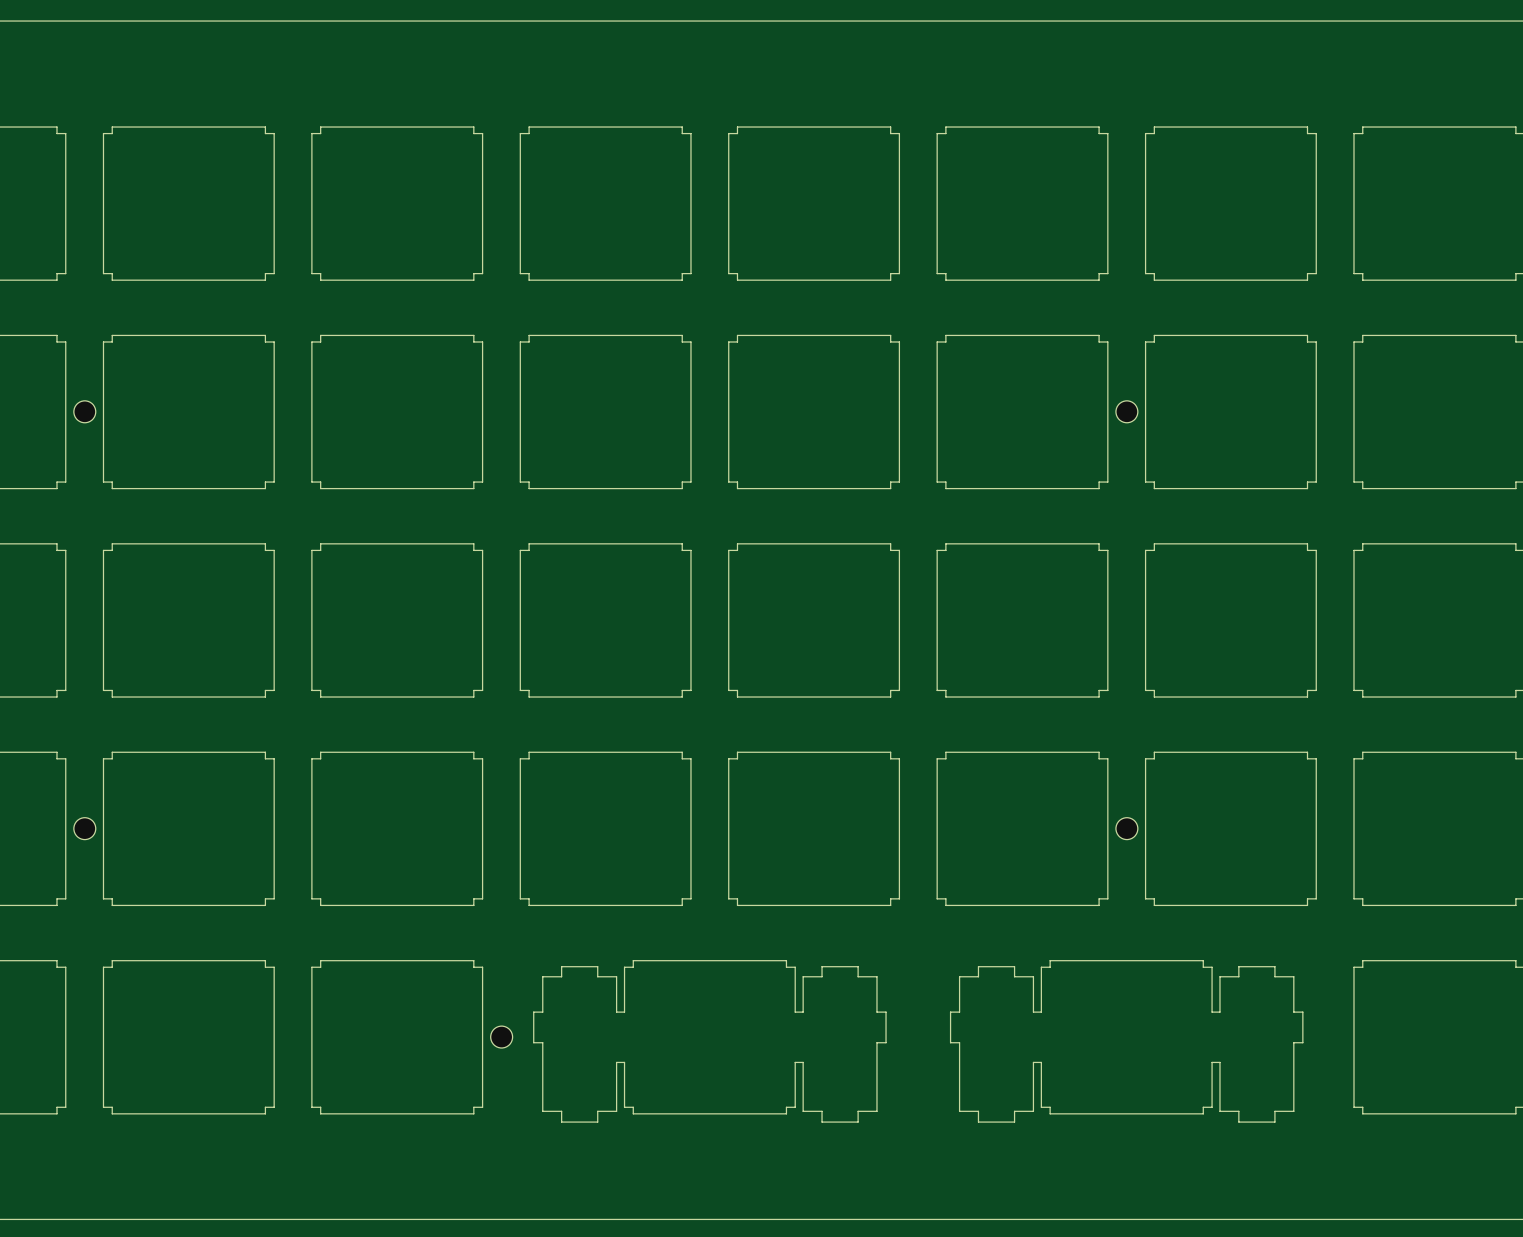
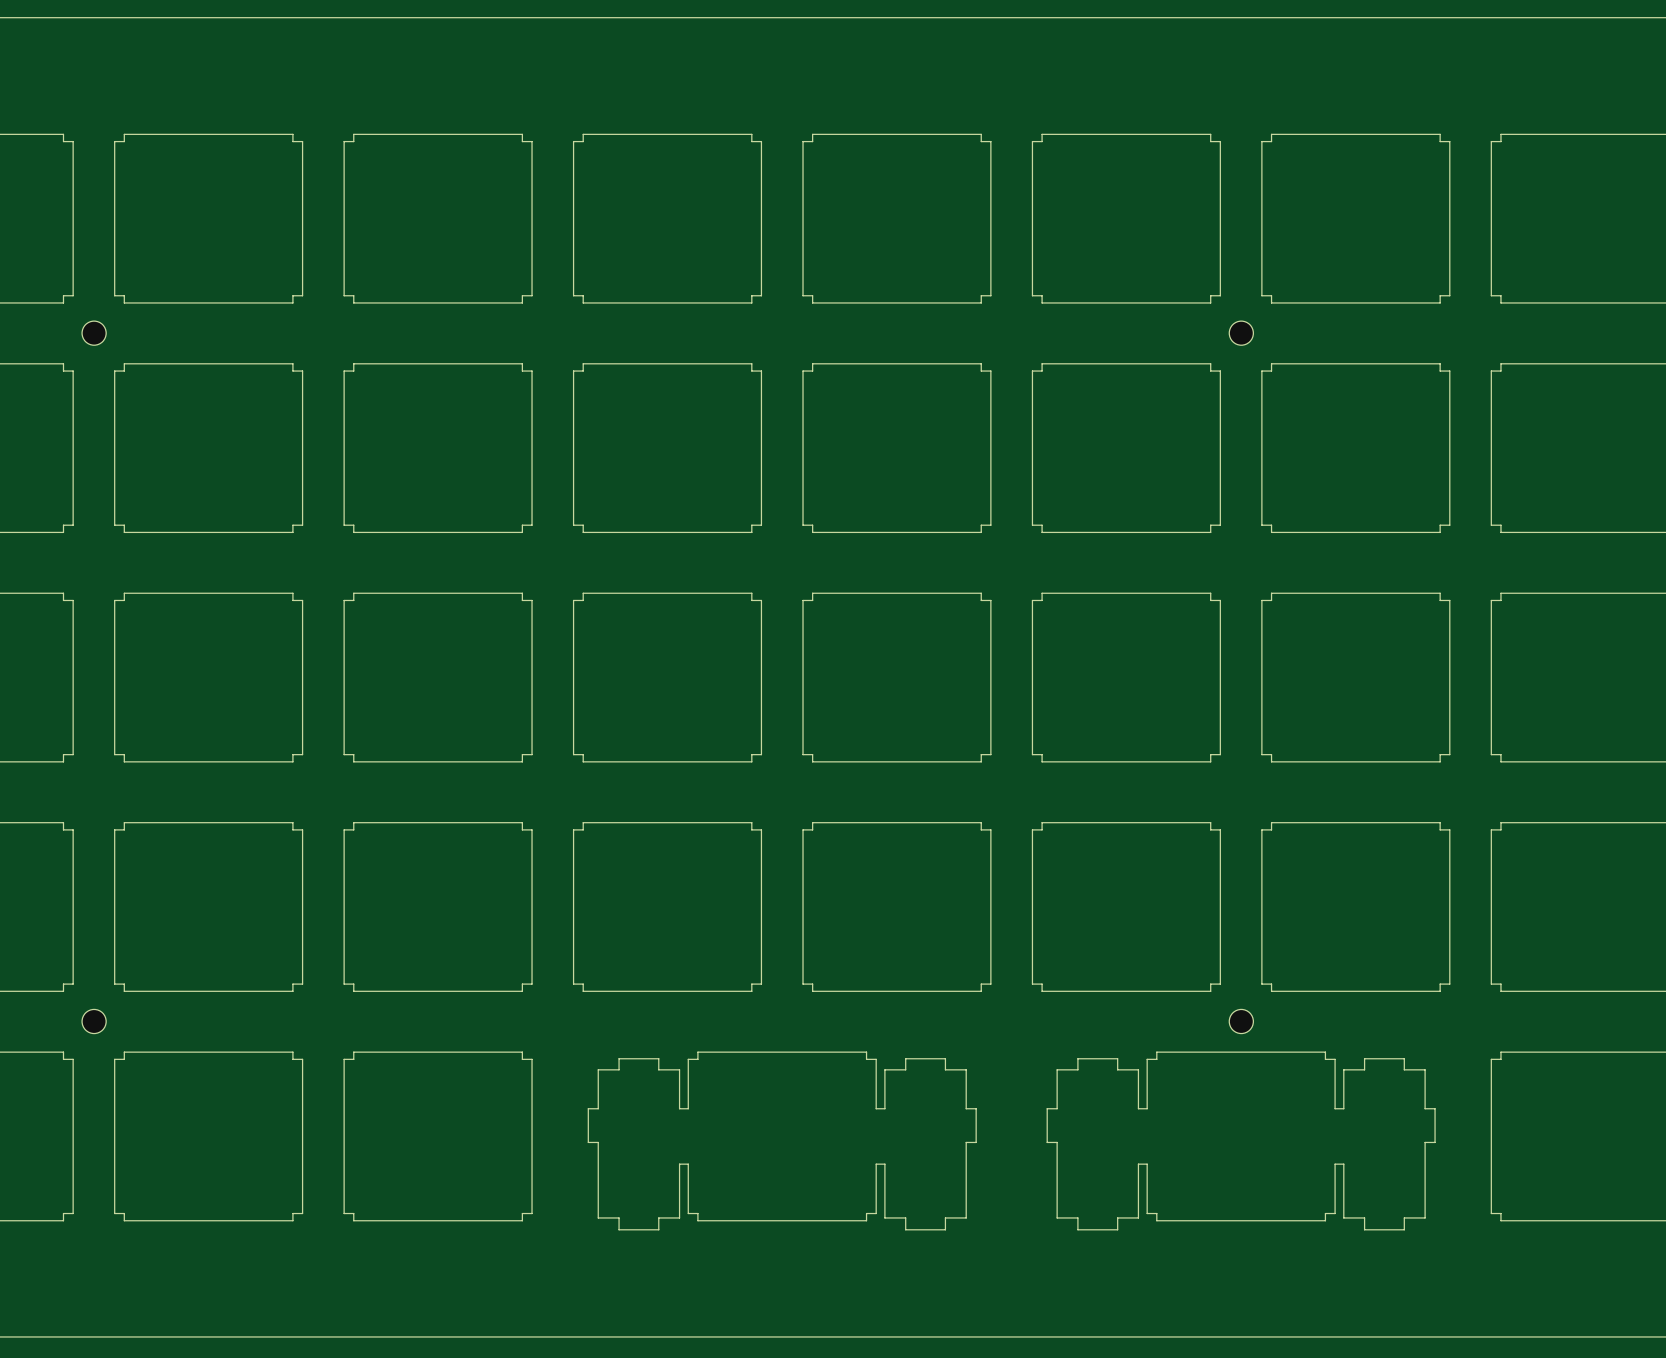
part position: (84, 411) -> (94, 333)
part position: (1126, 411) -> (1241, 333)
part position: (84, 828) -> (94, 1021)
part position: (1126, 828) -> (1241, 1021)
part: (501, 1037) -> none

